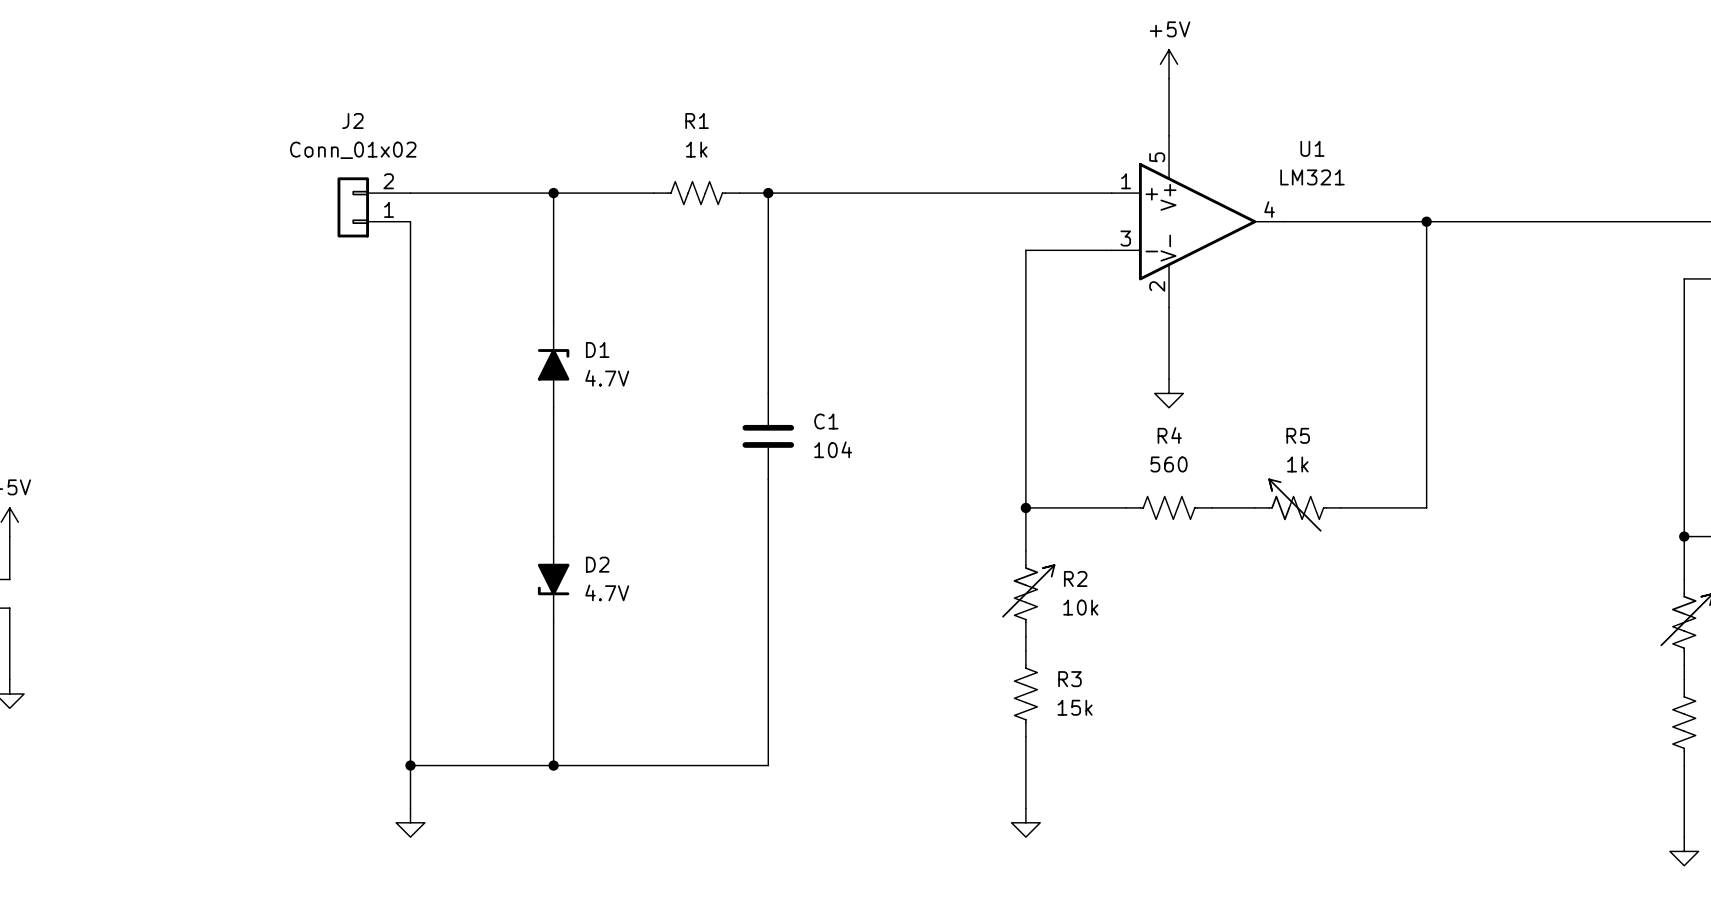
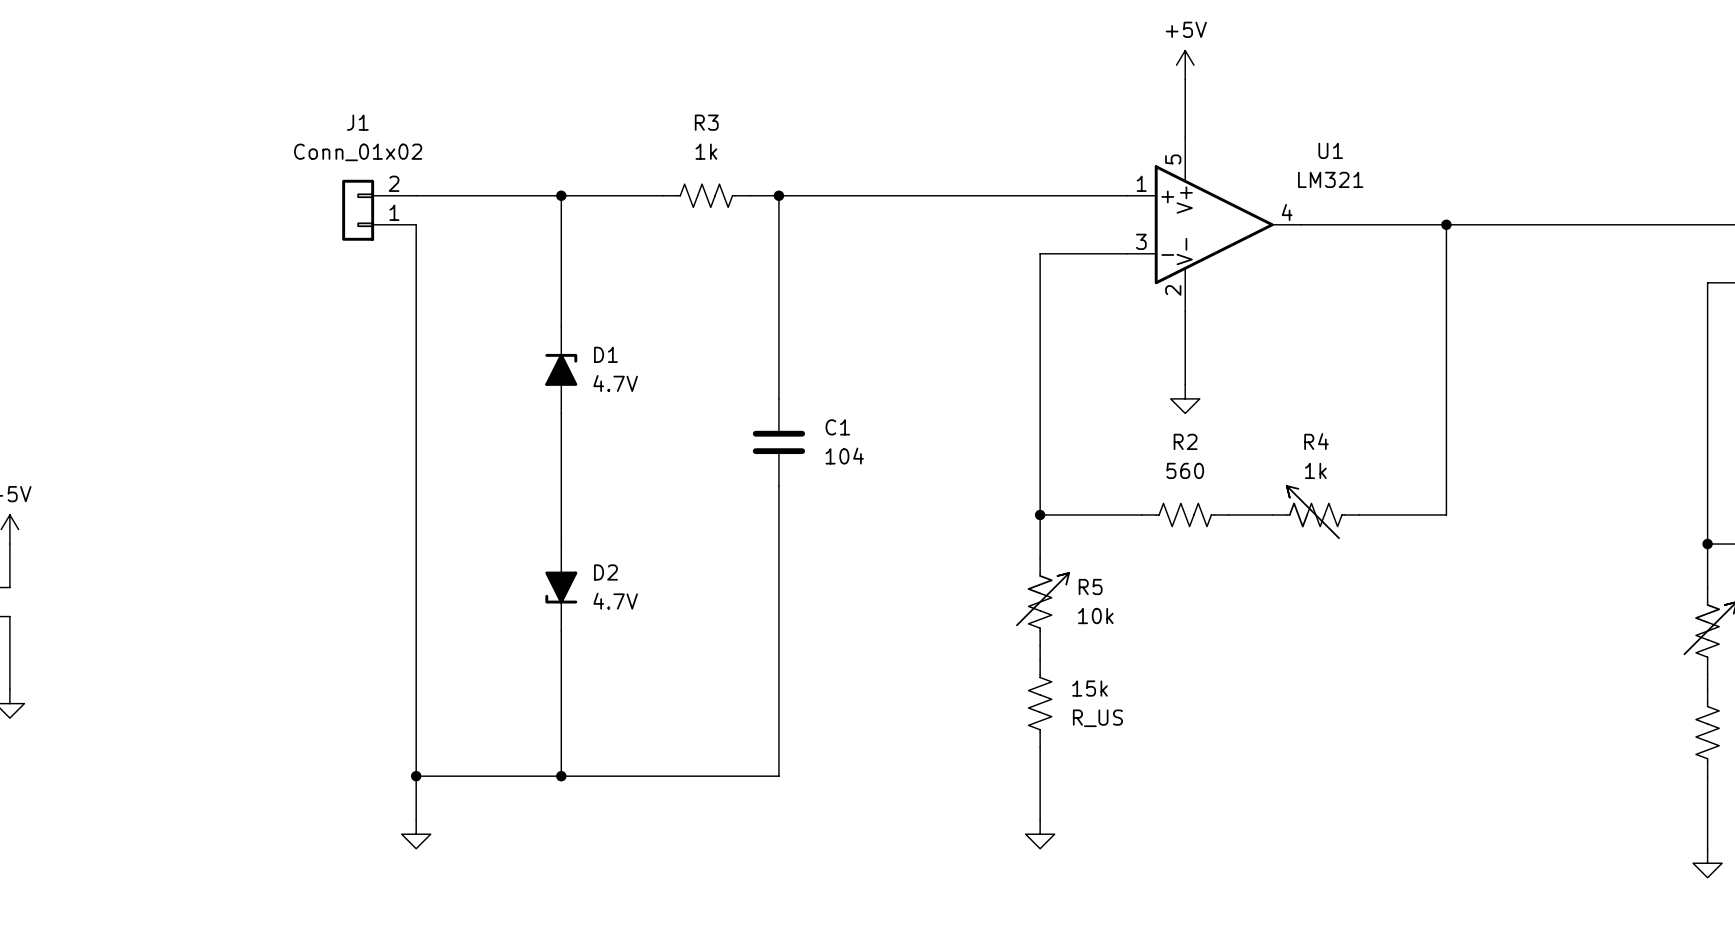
J2 name: J2 (352, 120) -> J1 (357, 122)
R1 name: R1 (697, 120) -> R3 (706, 122)
R4 name: R4 (1169, 435) -> R2 (1185, 441)
R5 name: R5 (1298, 435) -> R4 (1316, 441)
R2 name: R2 (1075, 578) -> R5 (1090, 587)
R3 name: R3 (1069, 679) -> 15k (1089, 688)
R3 value: 15k (1075, 707) -> R_US (1097, 718)

